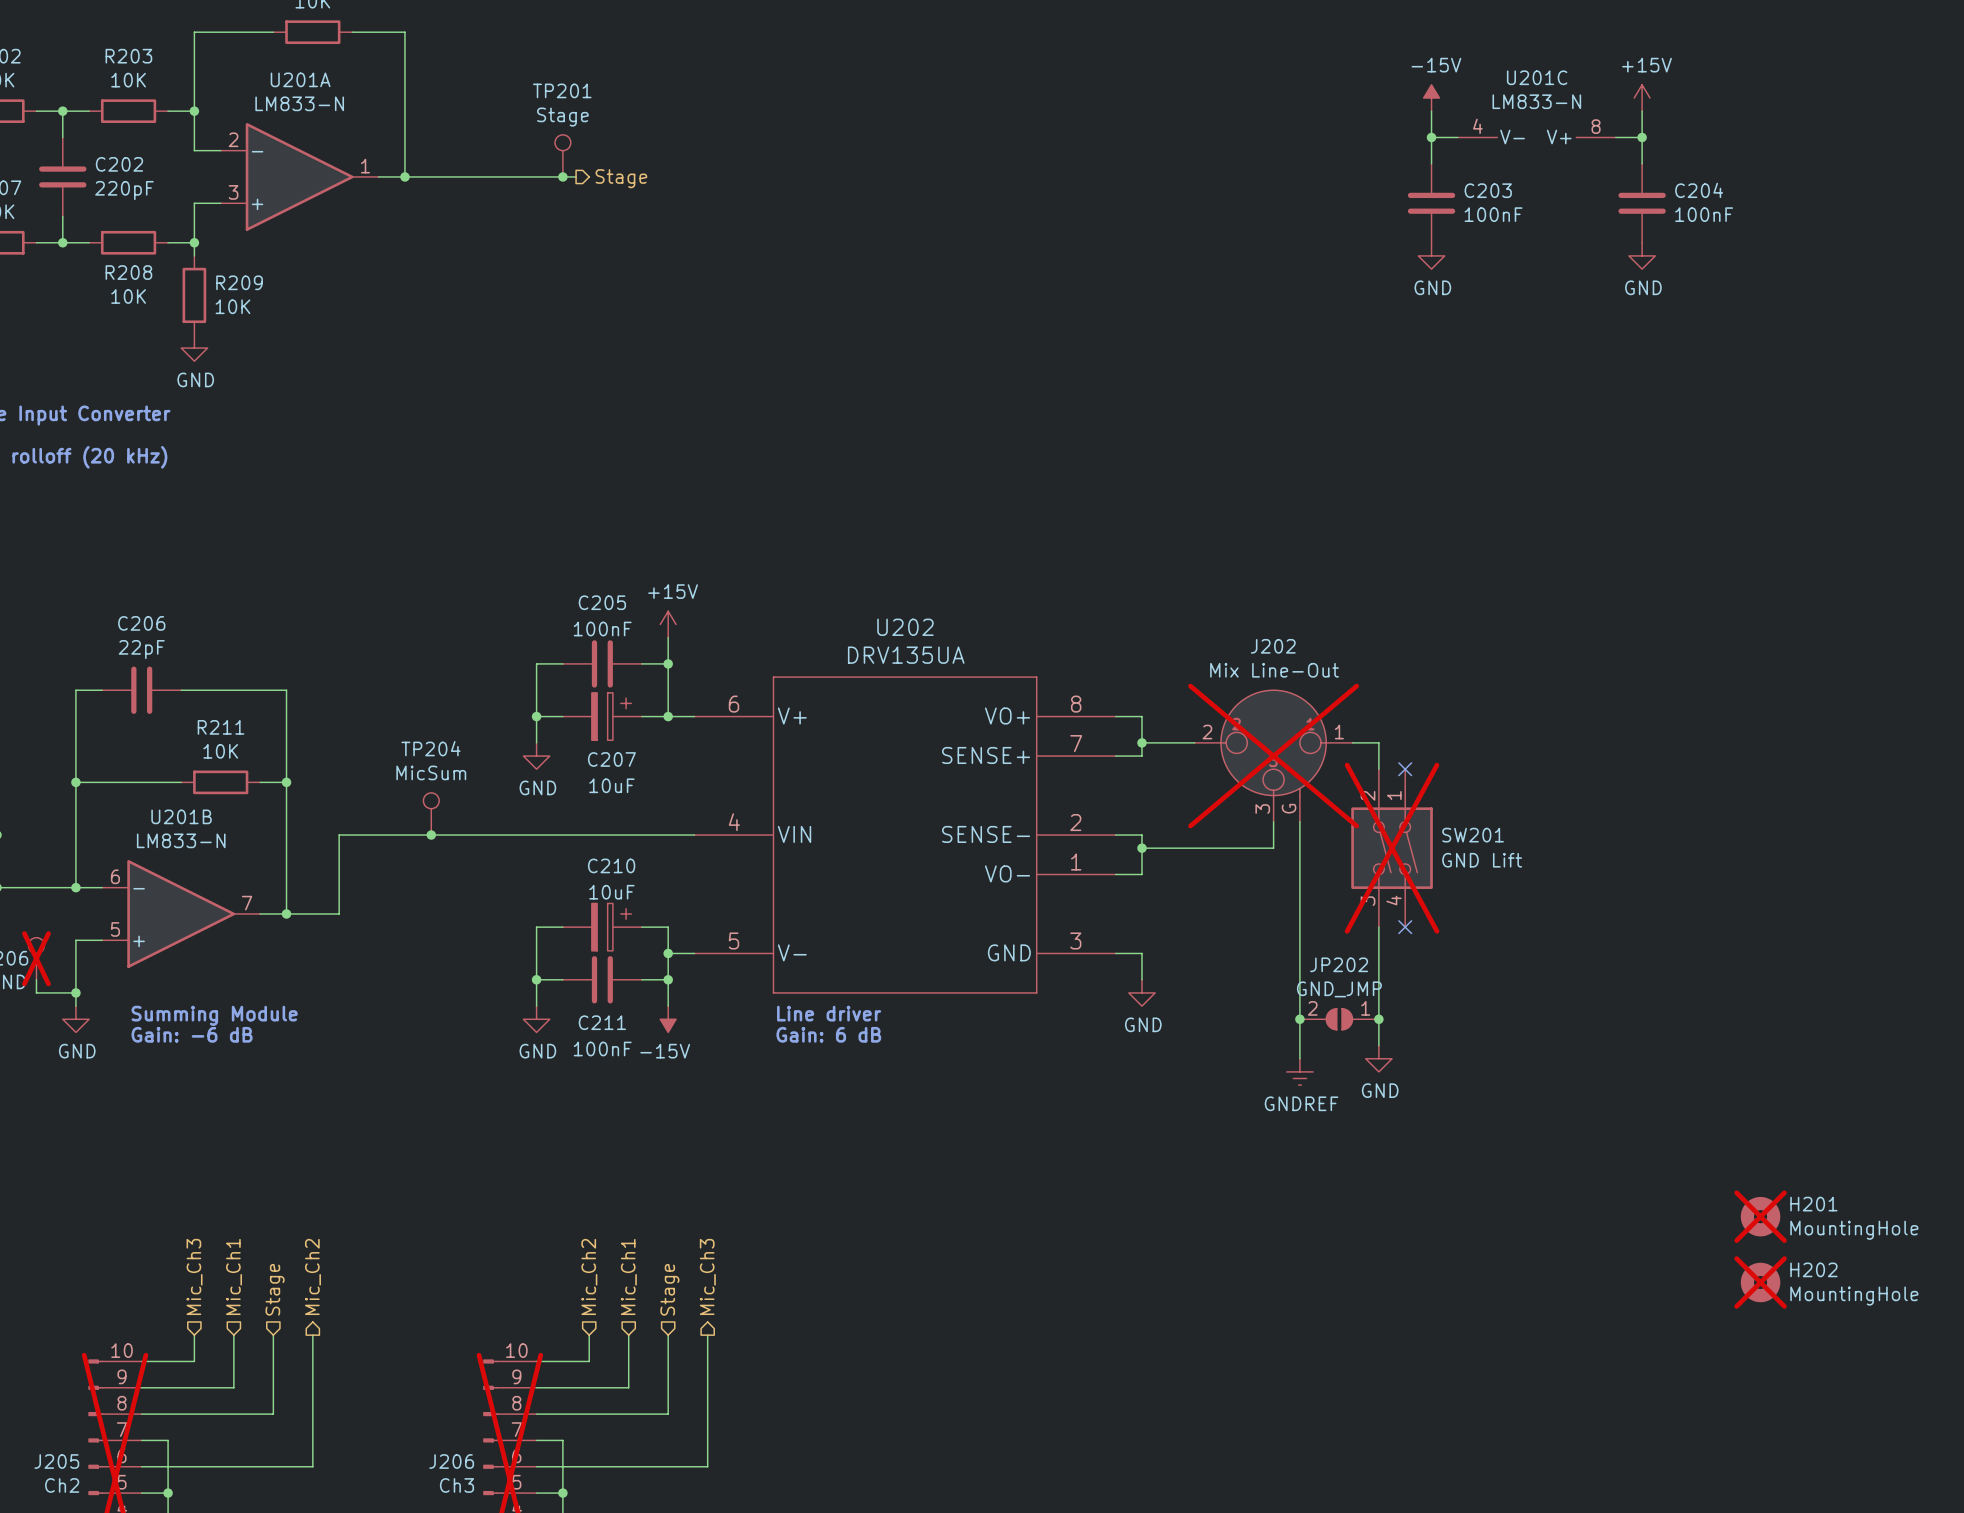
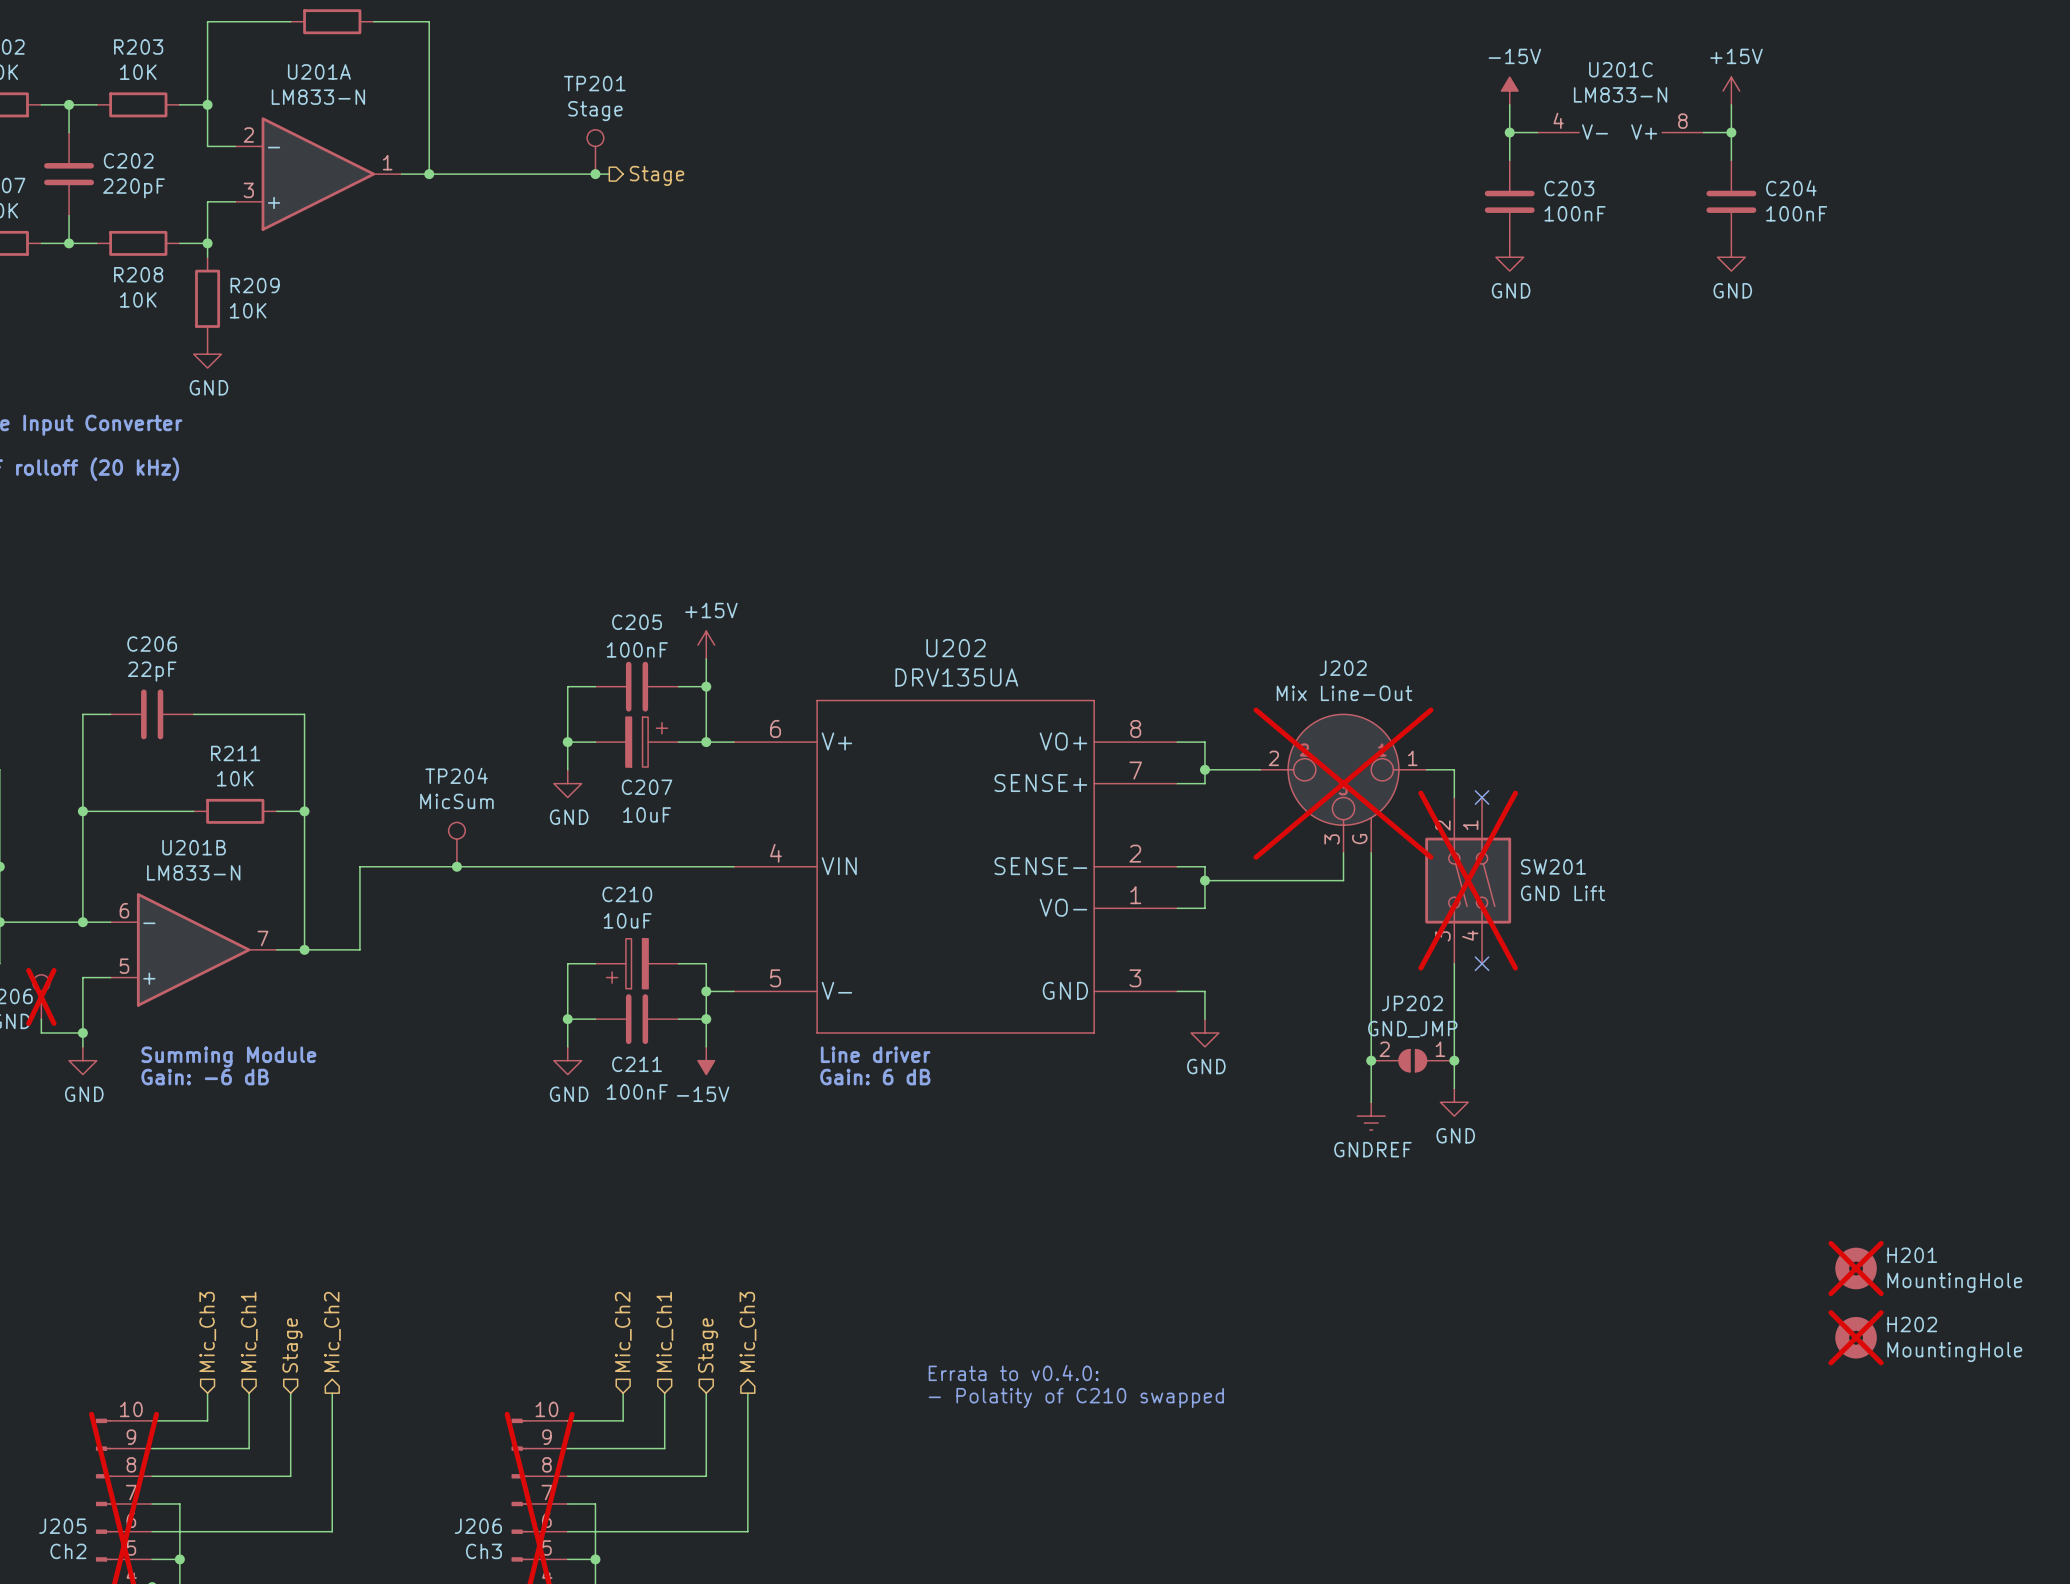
C210 rotation: 0° (611, 927) -> 180° (627, 963)
text: none -> Errata to v0.4.0: (1013, 1373)
text: none -> - Polatity of C210 swapped (1076, 1397)

